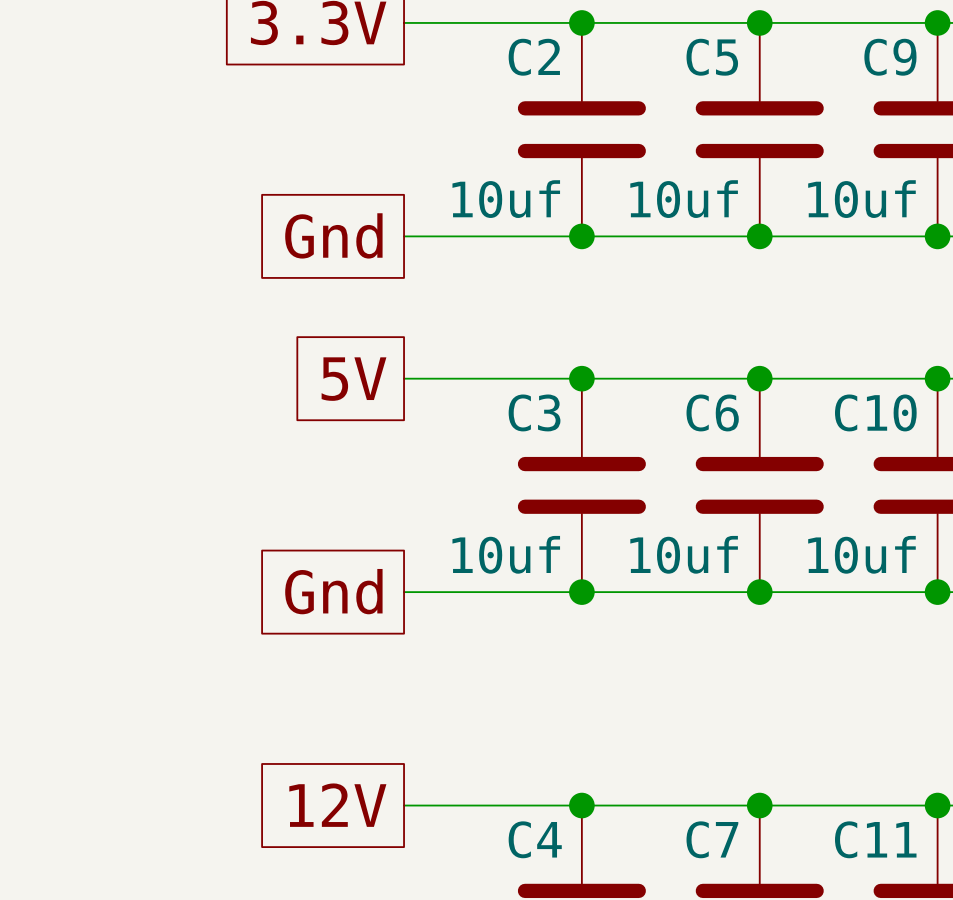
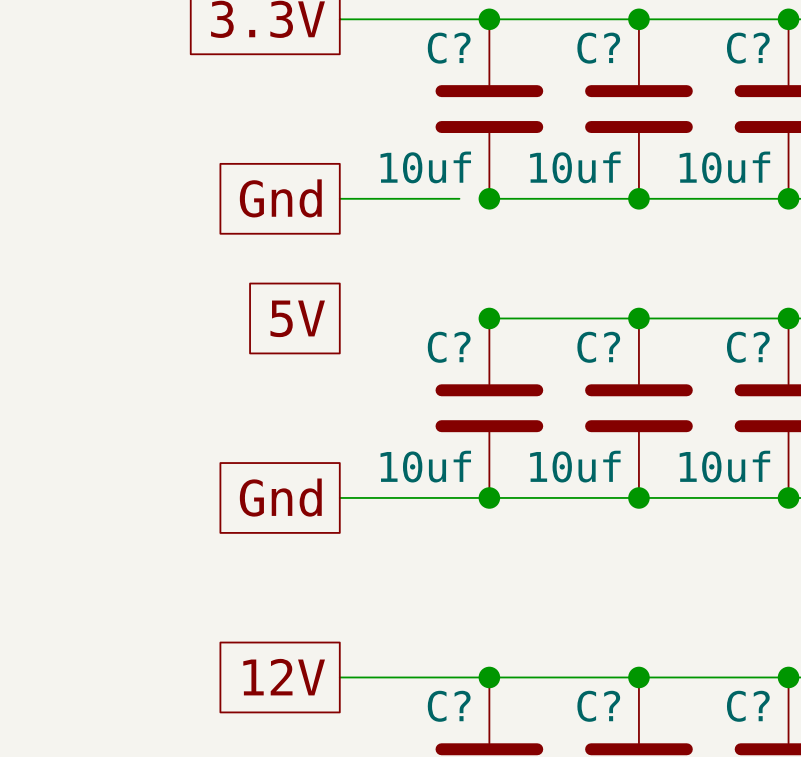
C2 name: C2 (534, 57) -> C? (449, 48)
C5 name: C5 (712, 57) -> C? (598, 48)
C9 name: C9 (890, 57) -> C? (748, 48)
wire: (546, 236) (581, 236) -> none
wire: (404, 378) (581, 378) -> none
C3 name: C3 (534, 412) -> C? (449, 347)
C6 name: C6 (712, 412) -> C? (598, 347)
C10 name: C10 (875, 412) -> C? (748, 347)
C4 name: C4 (535, 839) -> C? (449, 706)
C7 name: C7 (712, 839) -> C? (598, 706)
C11 name: C11 (875, 839) -> C? (748, 706)

